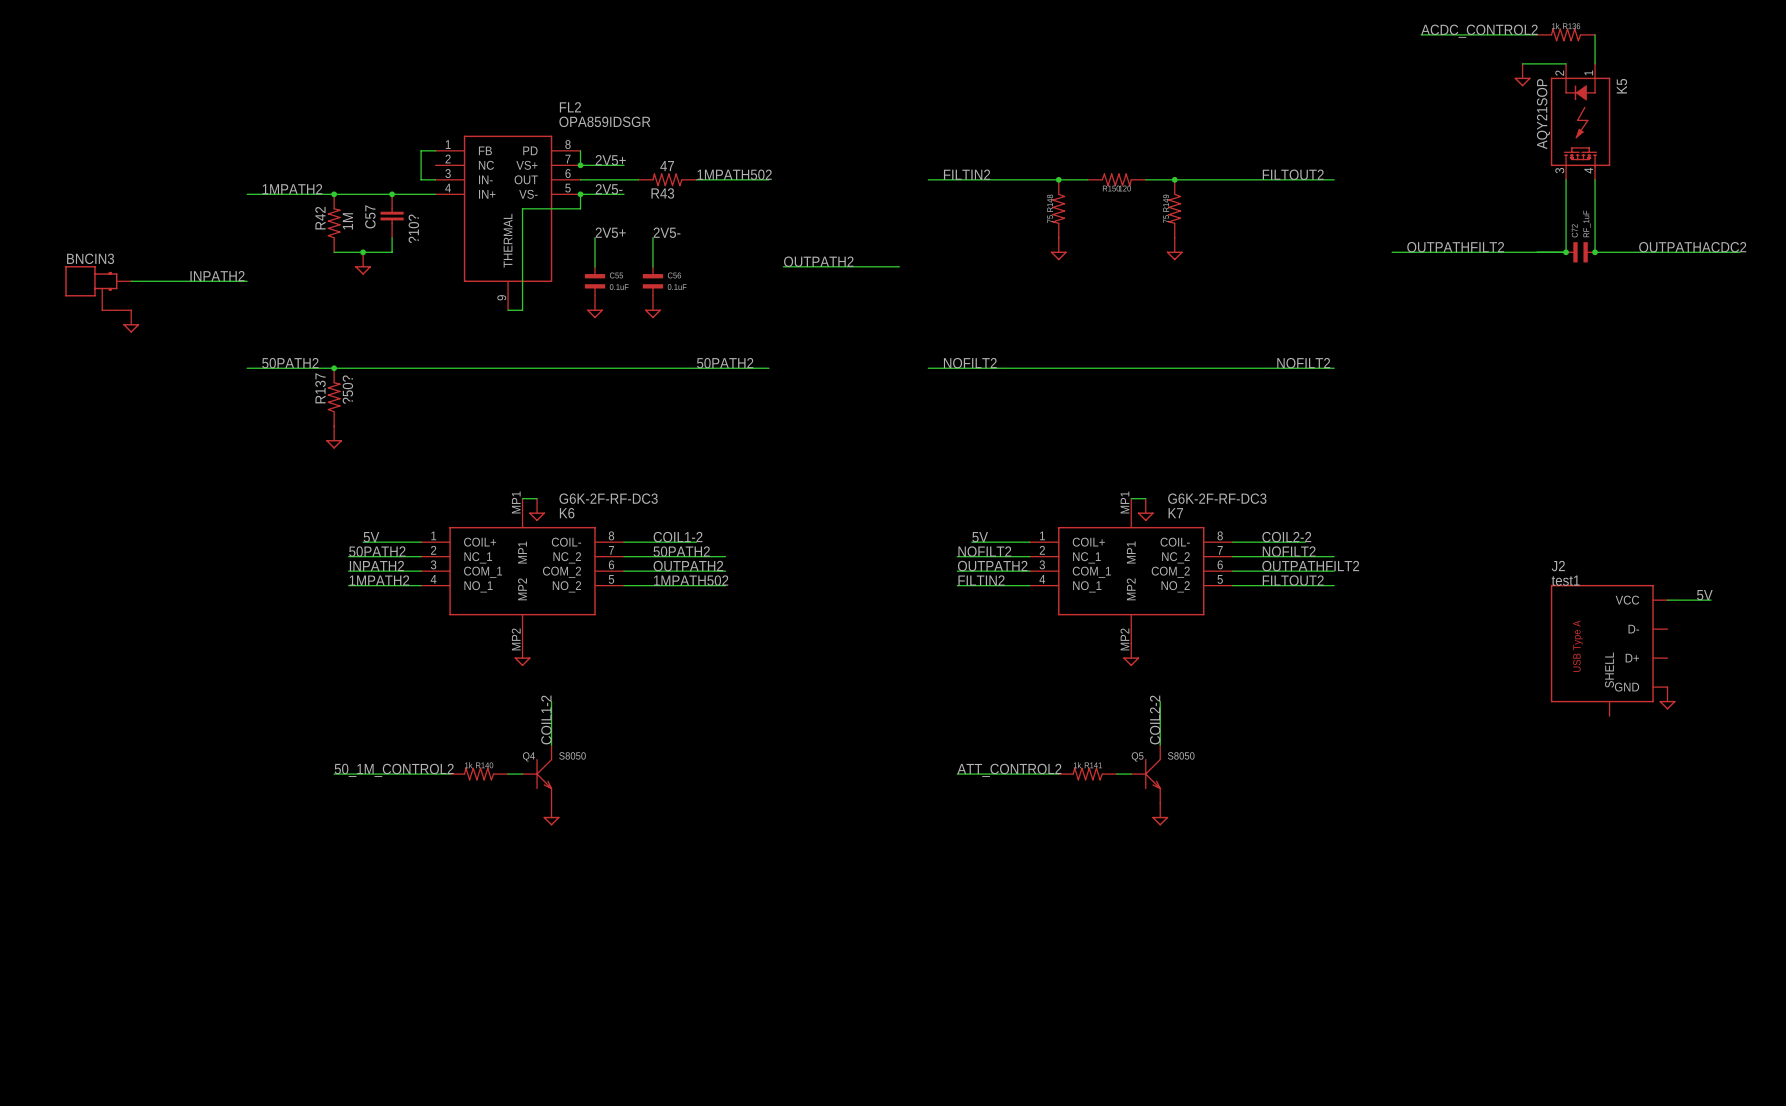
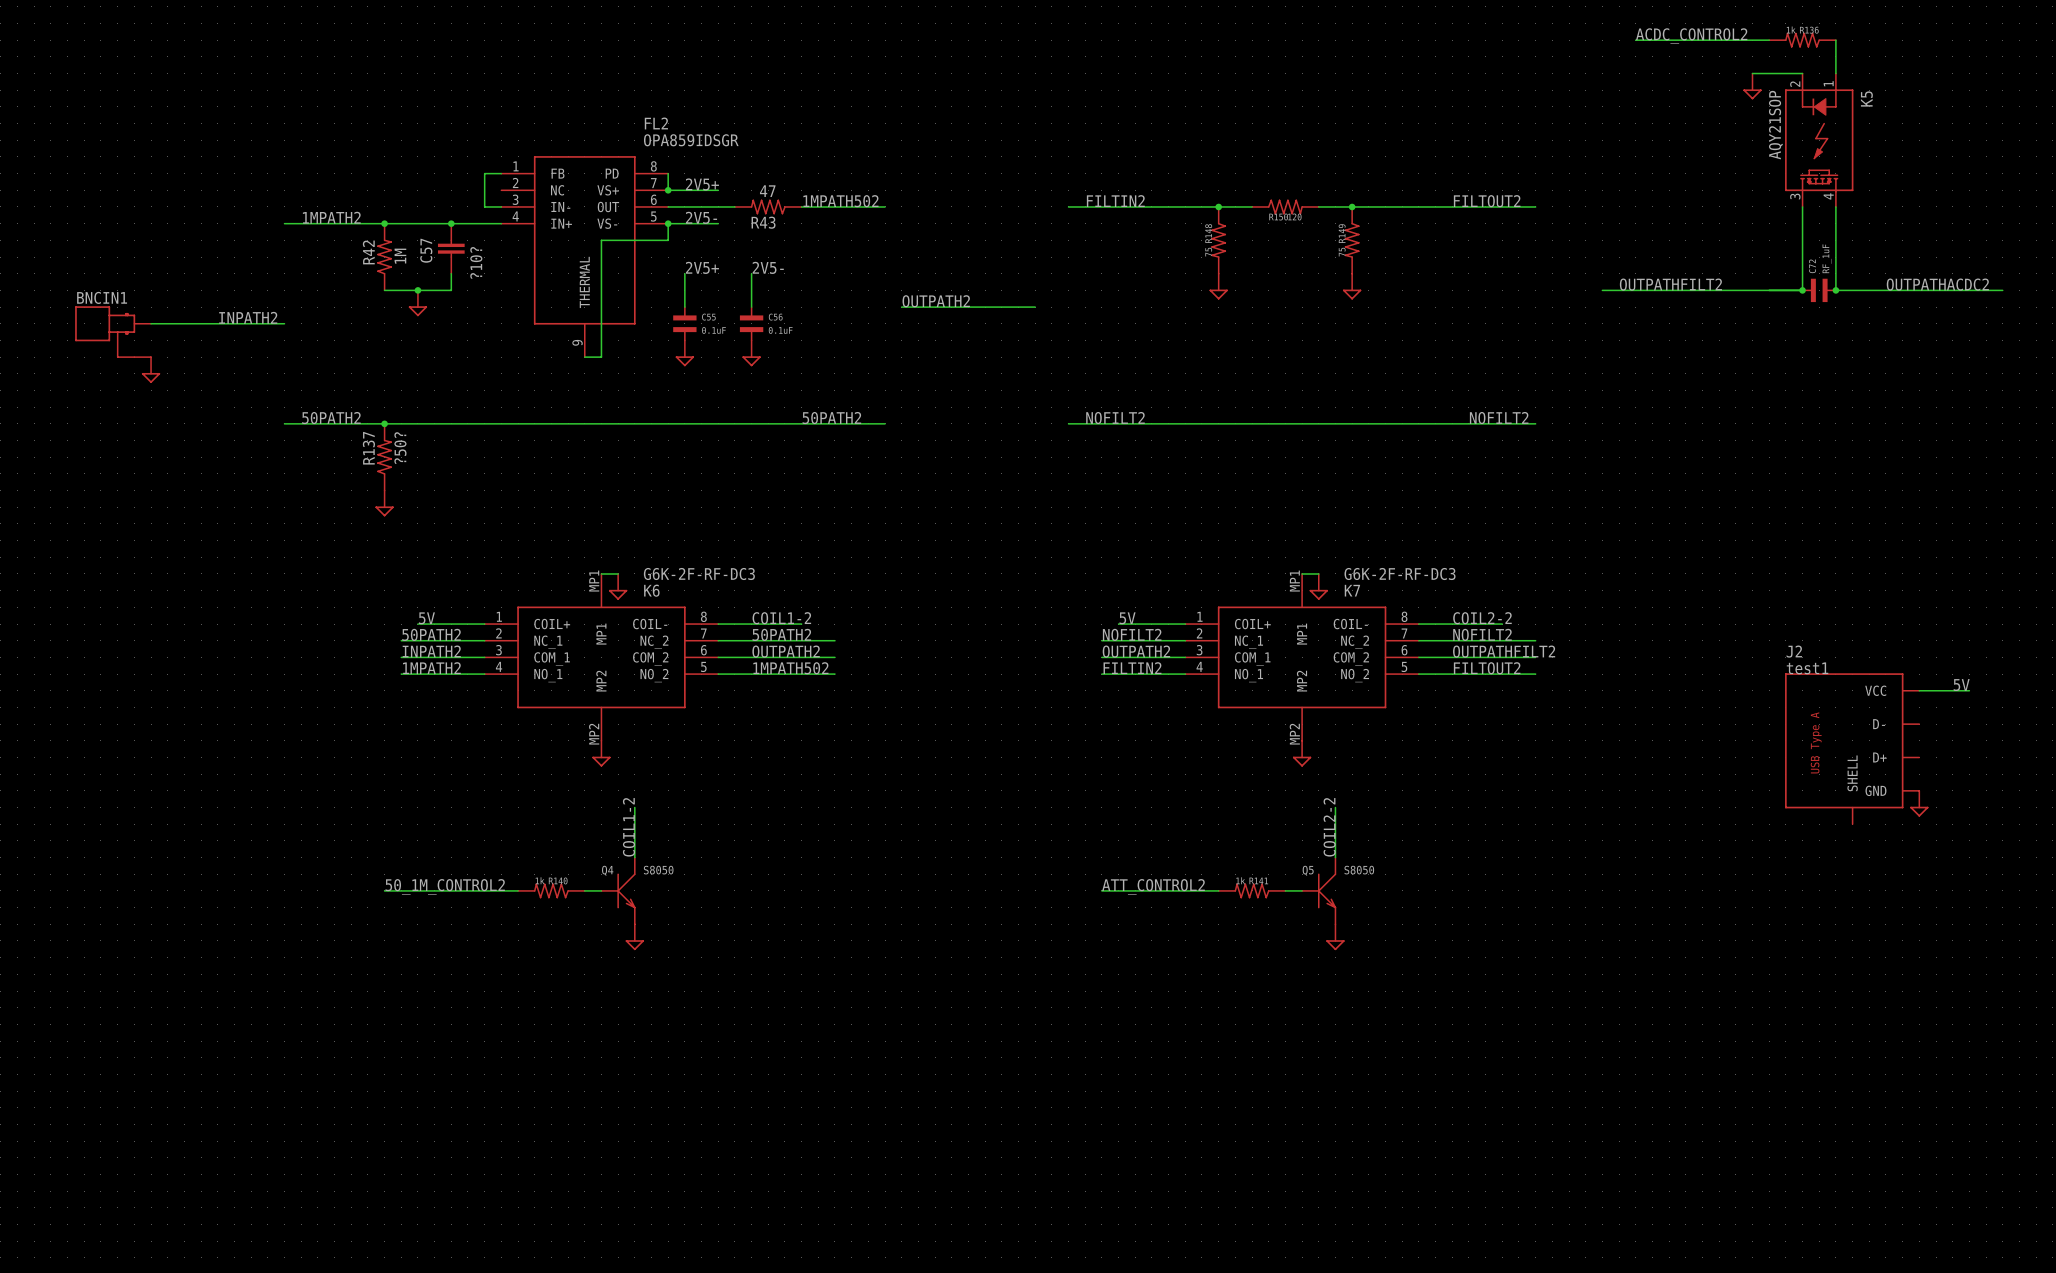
BNCIN3 name: BNCIN3 (90, 258) -> BNCIN1 (102, 297)

